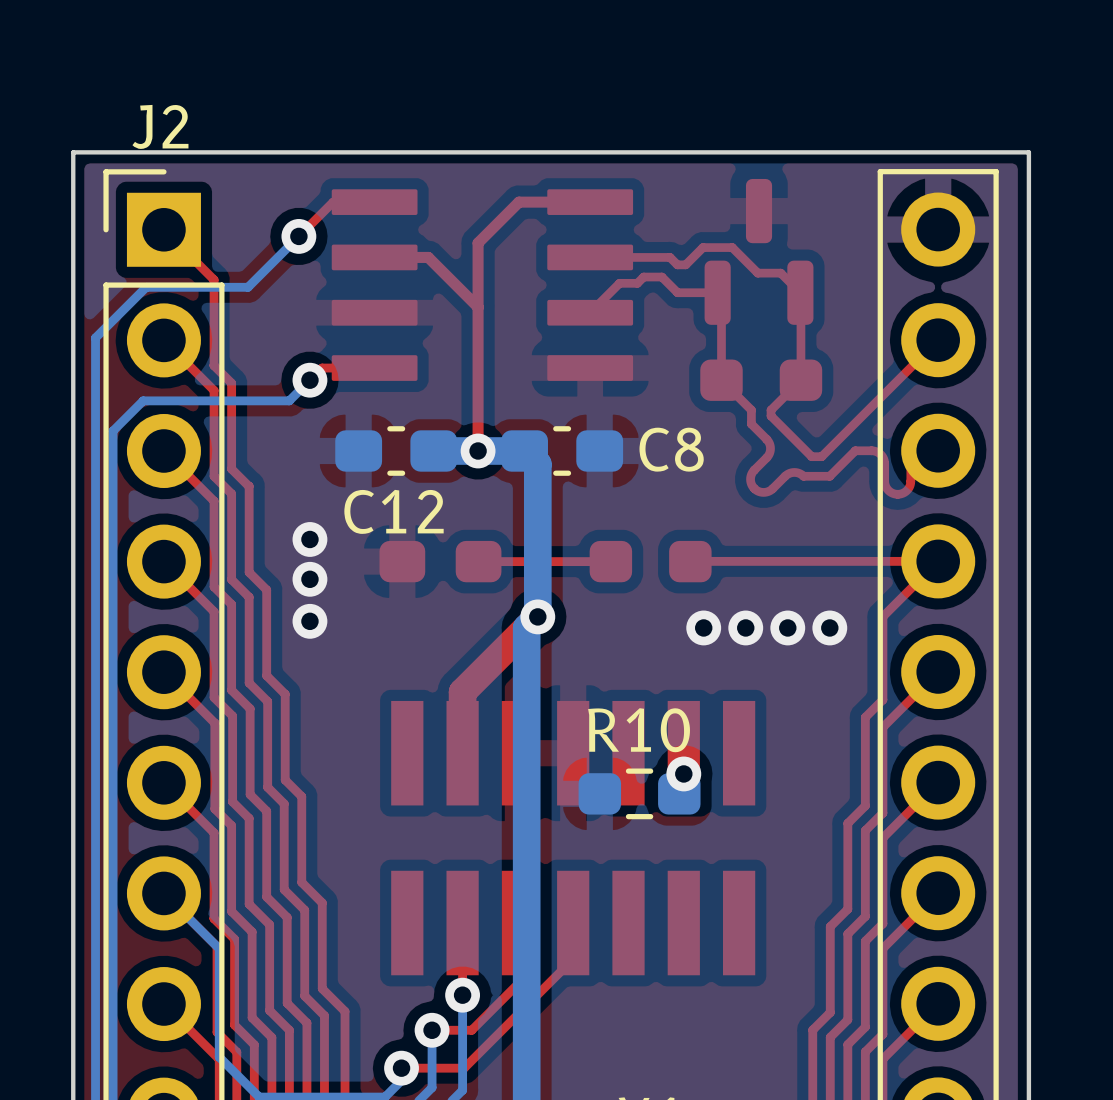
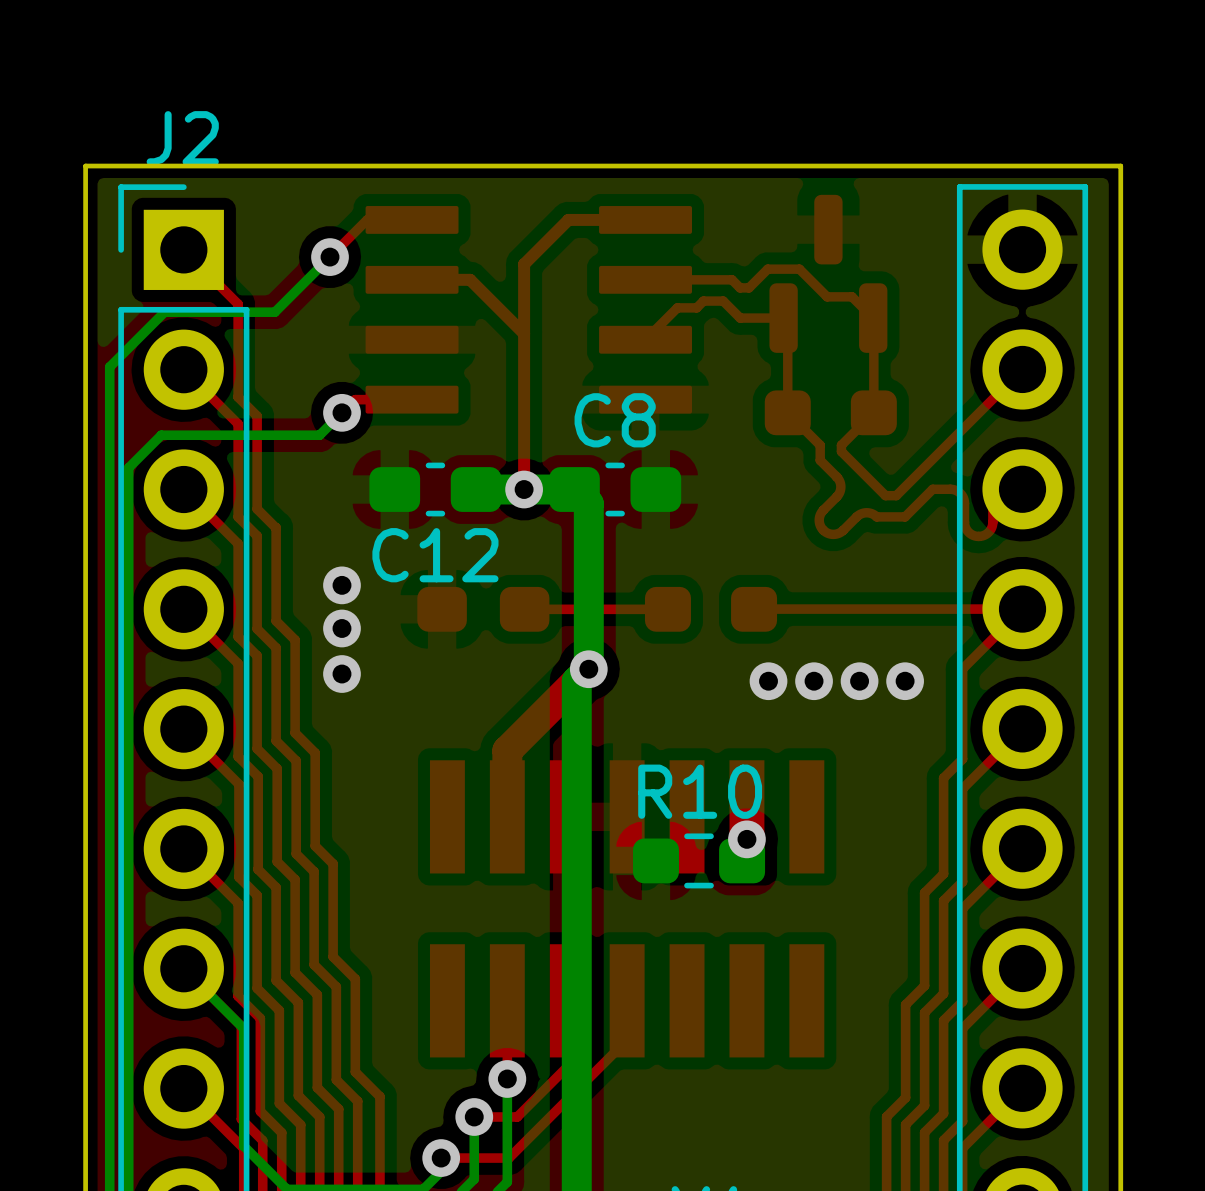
C8 name position: C8 (671, 449) -> C8 (615, 420)

